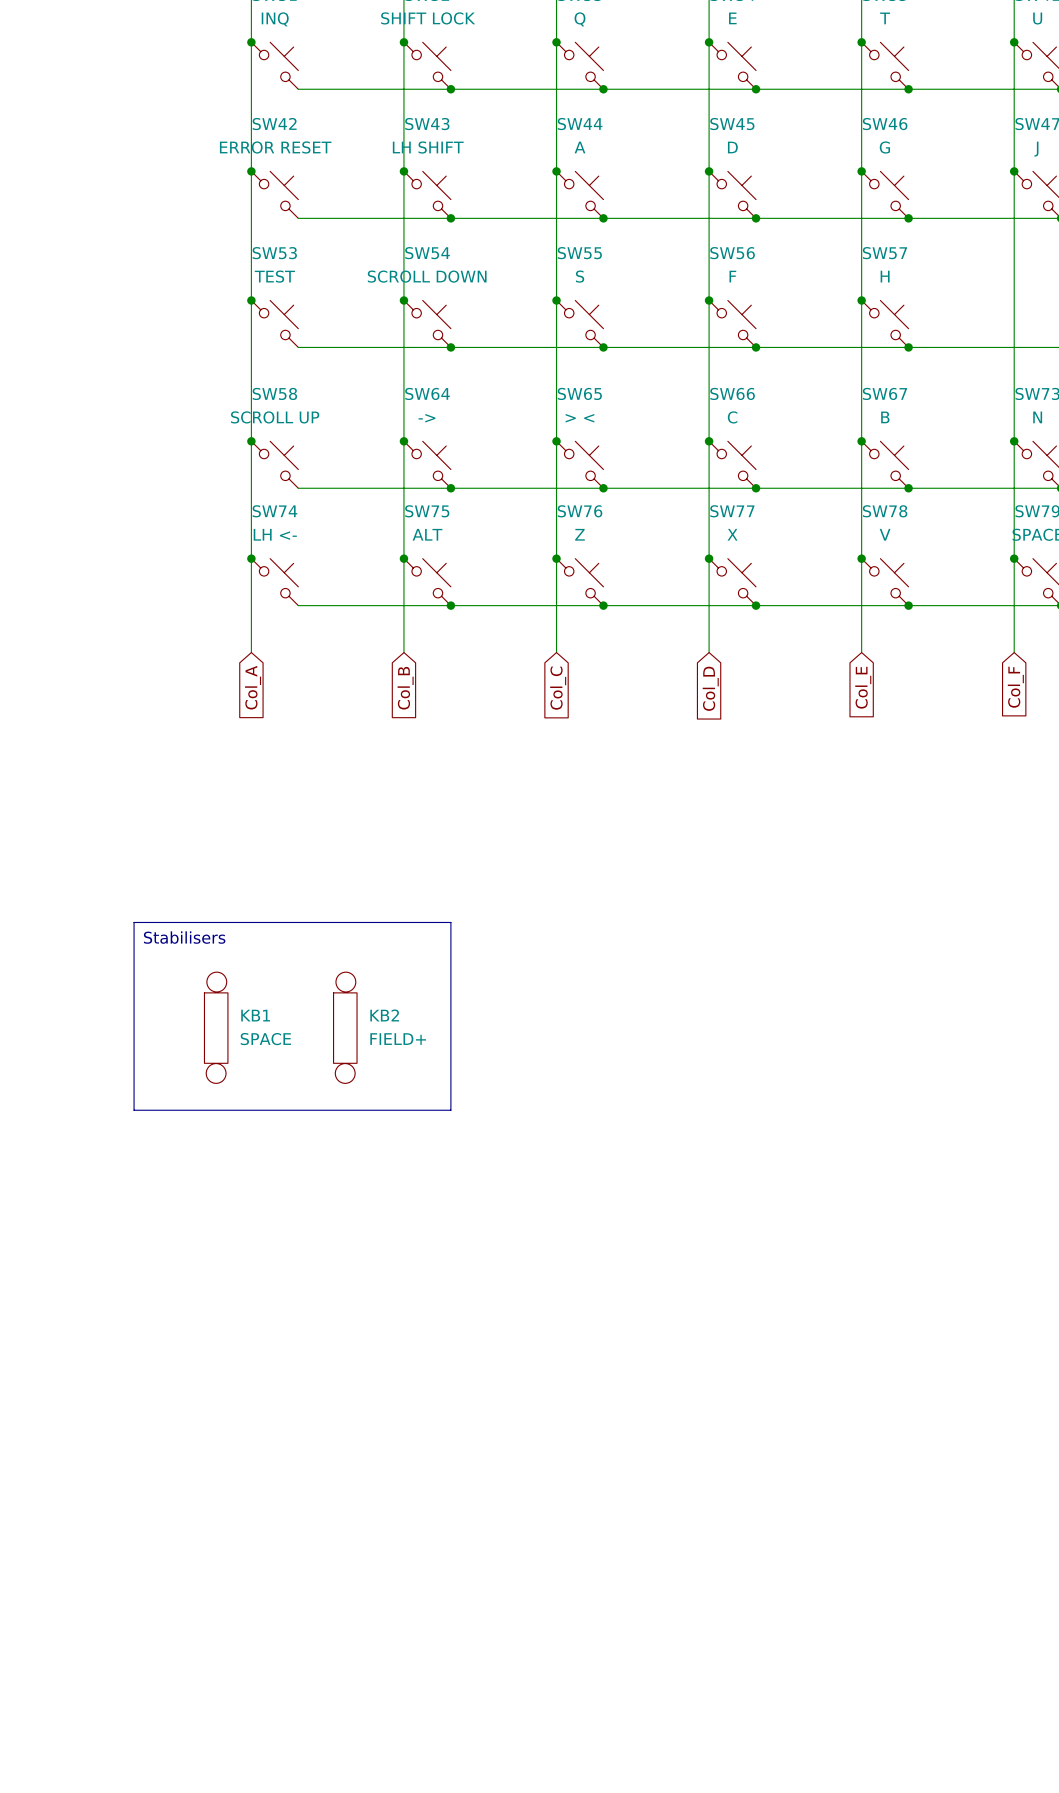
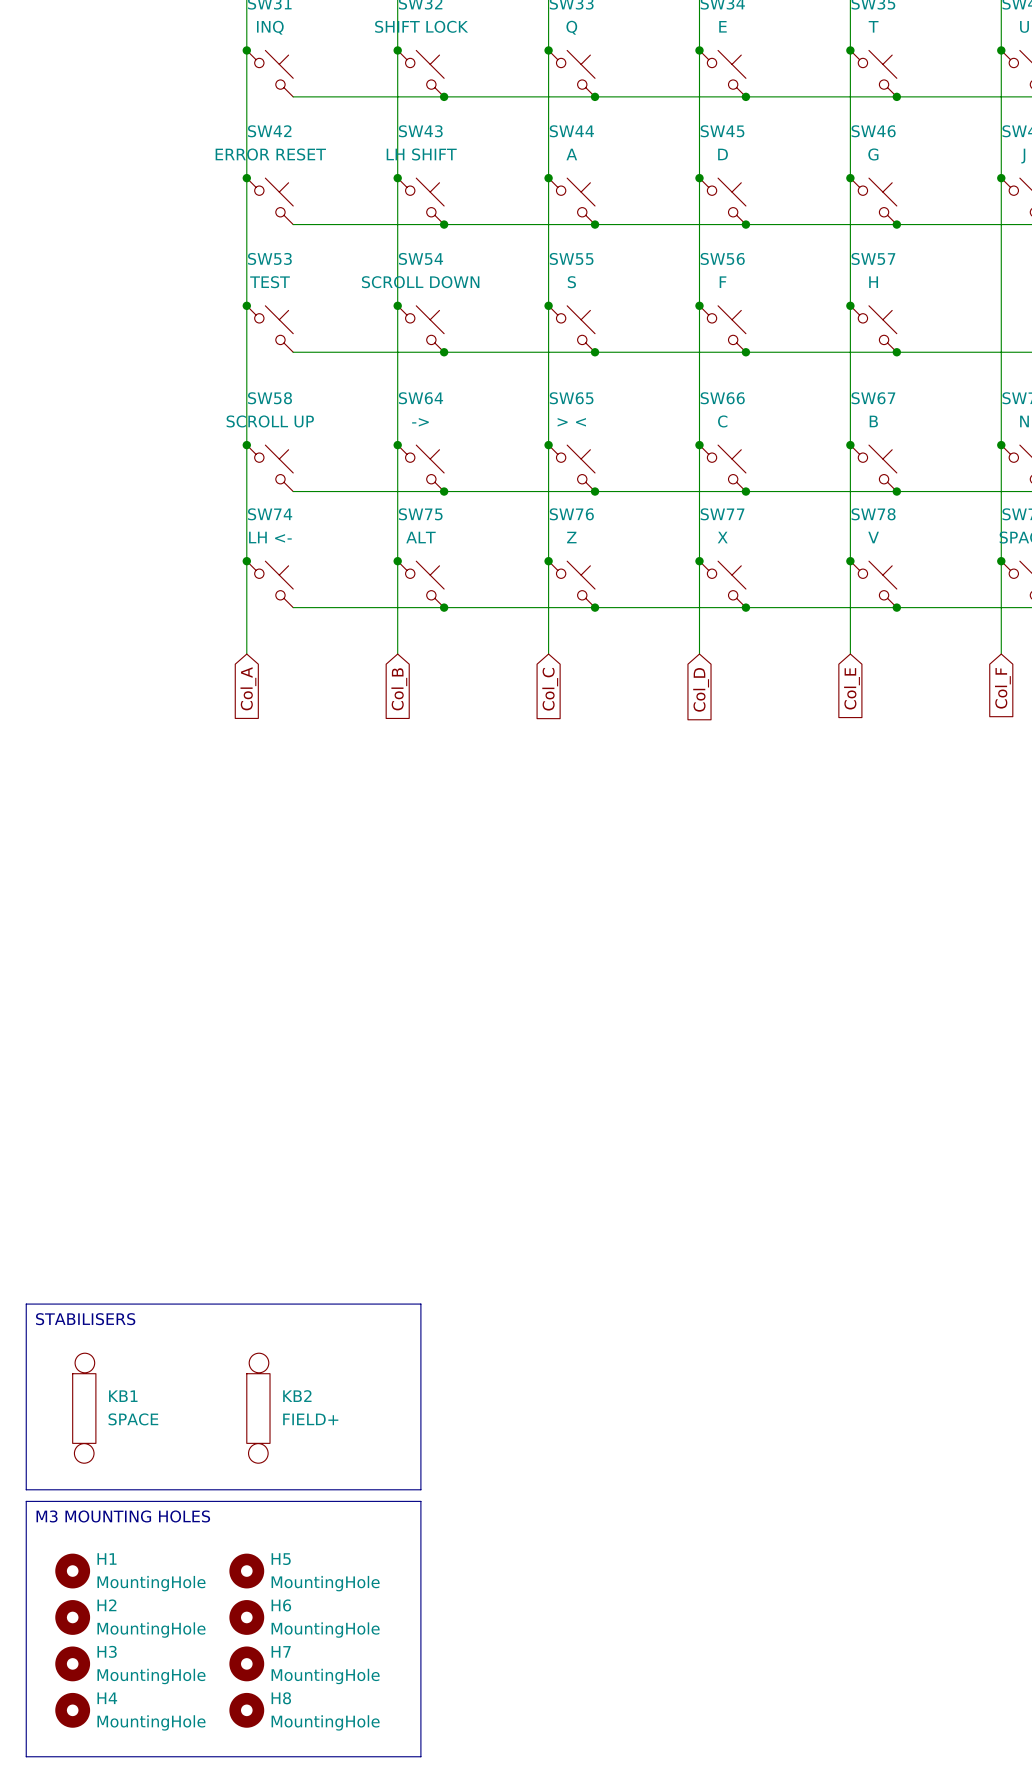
line: (134, 922) (450, 922) (450, 1110) (134, 1110) (134, 922) -> none
text: Stabilisers (184, 937) -> none
KB1 position: (216, 1027) -> (84, 1408)
KB2 position: (345, 1027) -> (258, 1408)
line: none -> (26, 1304) (26, 1489) (420, 1489) (420, 1304) (26, 1304)
text: none -> STABILISERS (85, 1319)
line: none -> (26, 1501) (420, 1501) (420, 1756) (26, 1756) (26, 1501)
text: none -> M3 MOUNTING HOLES (123, 1516)
H1: none -> MountingHole (72, 1571)
H5: none -> MountingHole (246, 1571)
H2: none -> MountingHole (72, 1617)
H6: none -> MountingHole (246, 1617)
H3: none -> MountingHole (72, 1663)
H7: none -> MountingHole (246, 1663)
H4: none -> MountingHole (72, 1710)
H8: none -> MountingHole (246, 1710)

